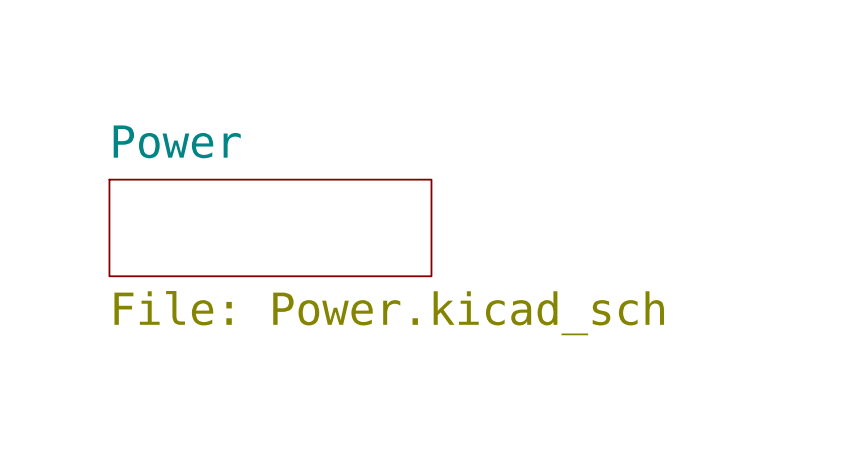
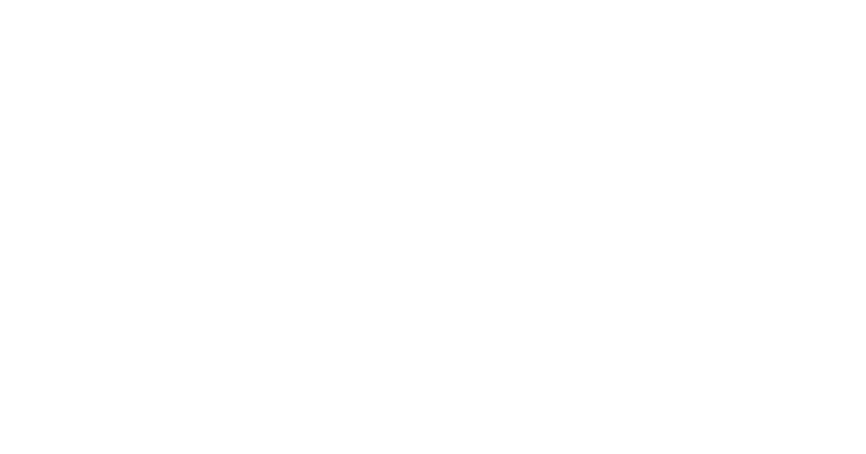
sheet Power: File: Power.kicad_sch (270, 227) -> none

